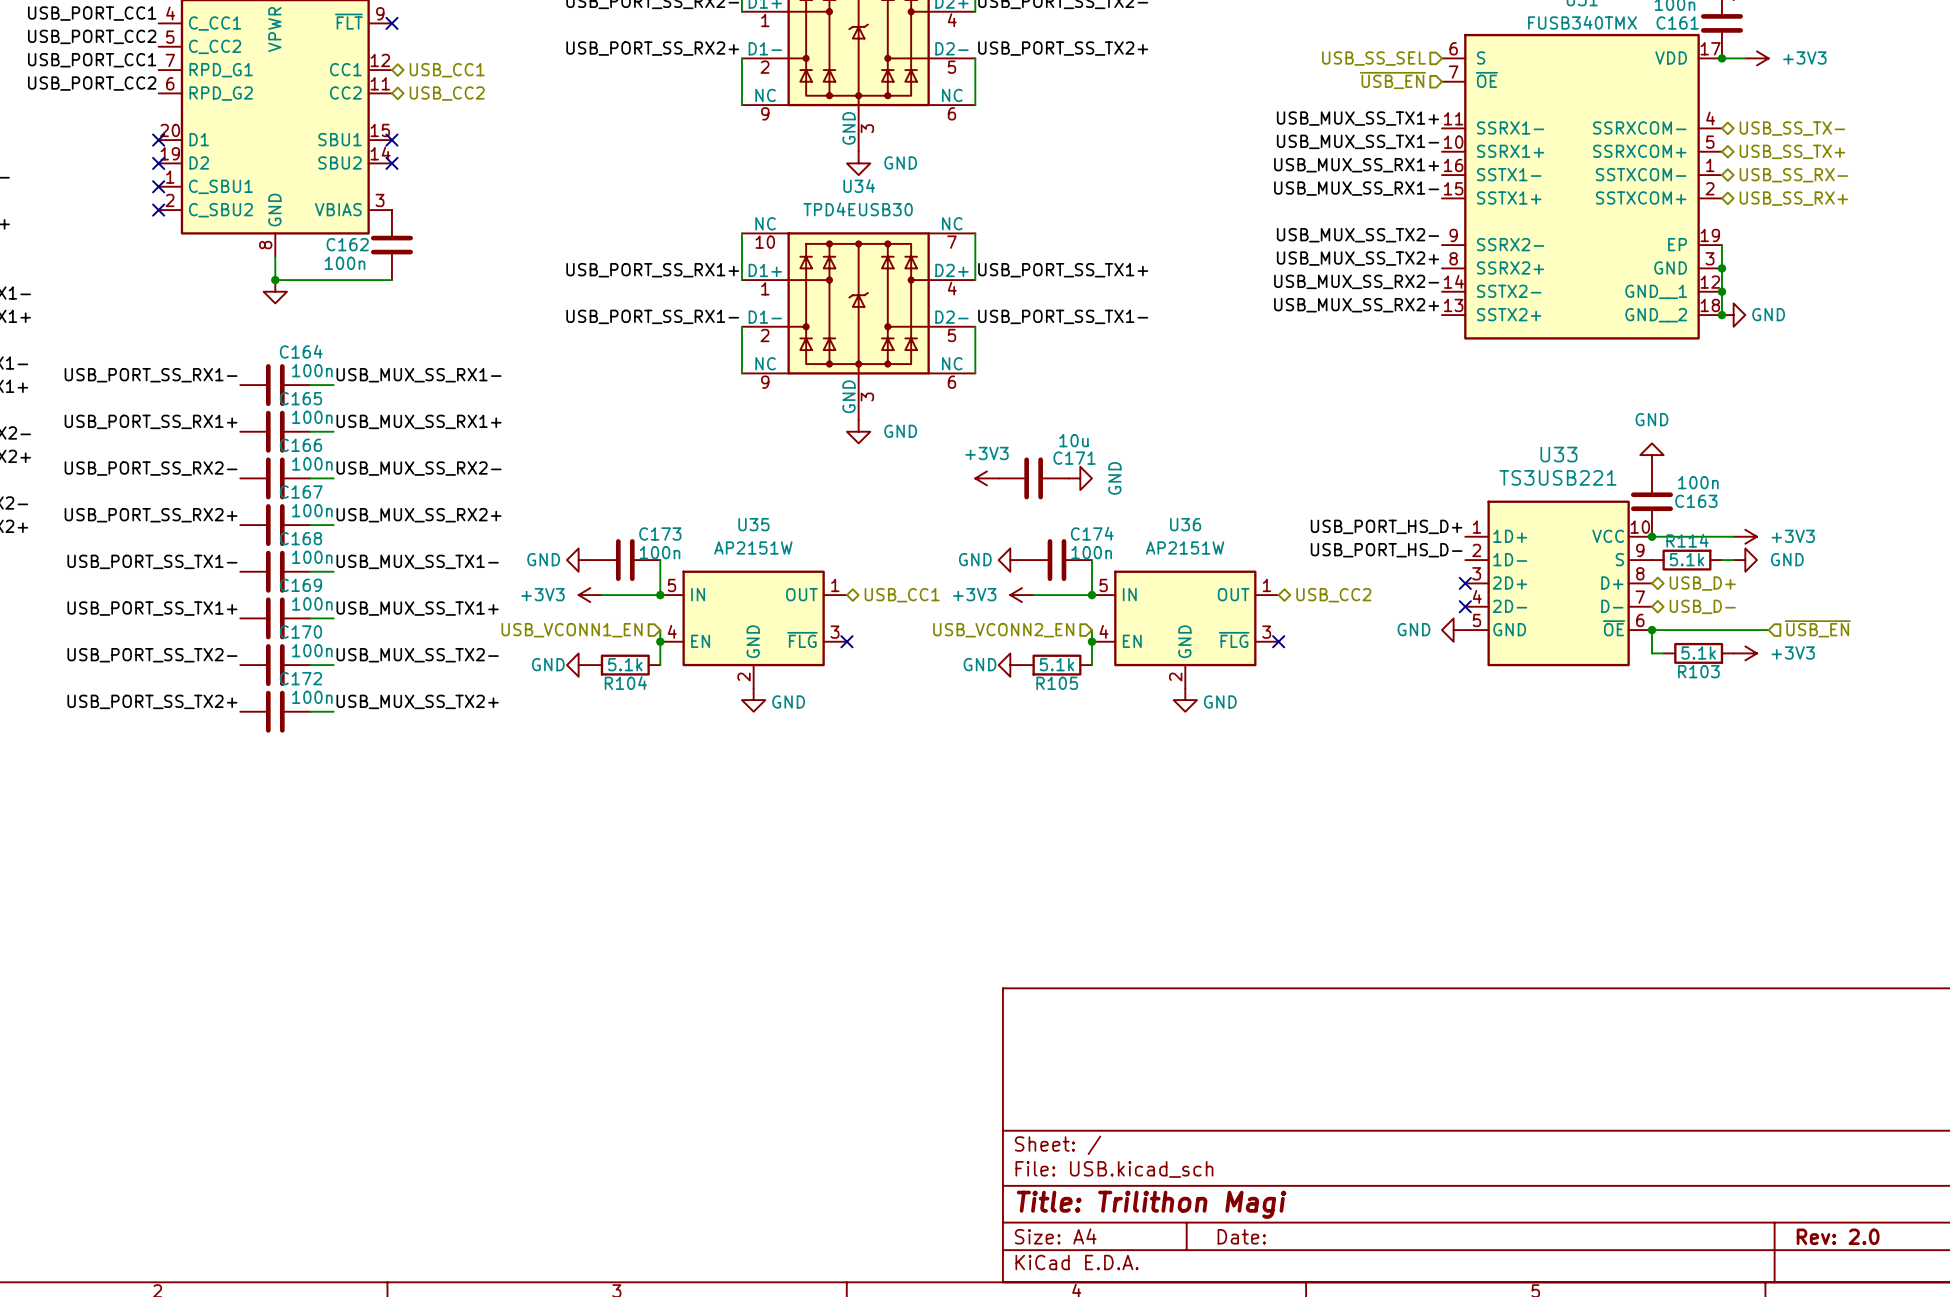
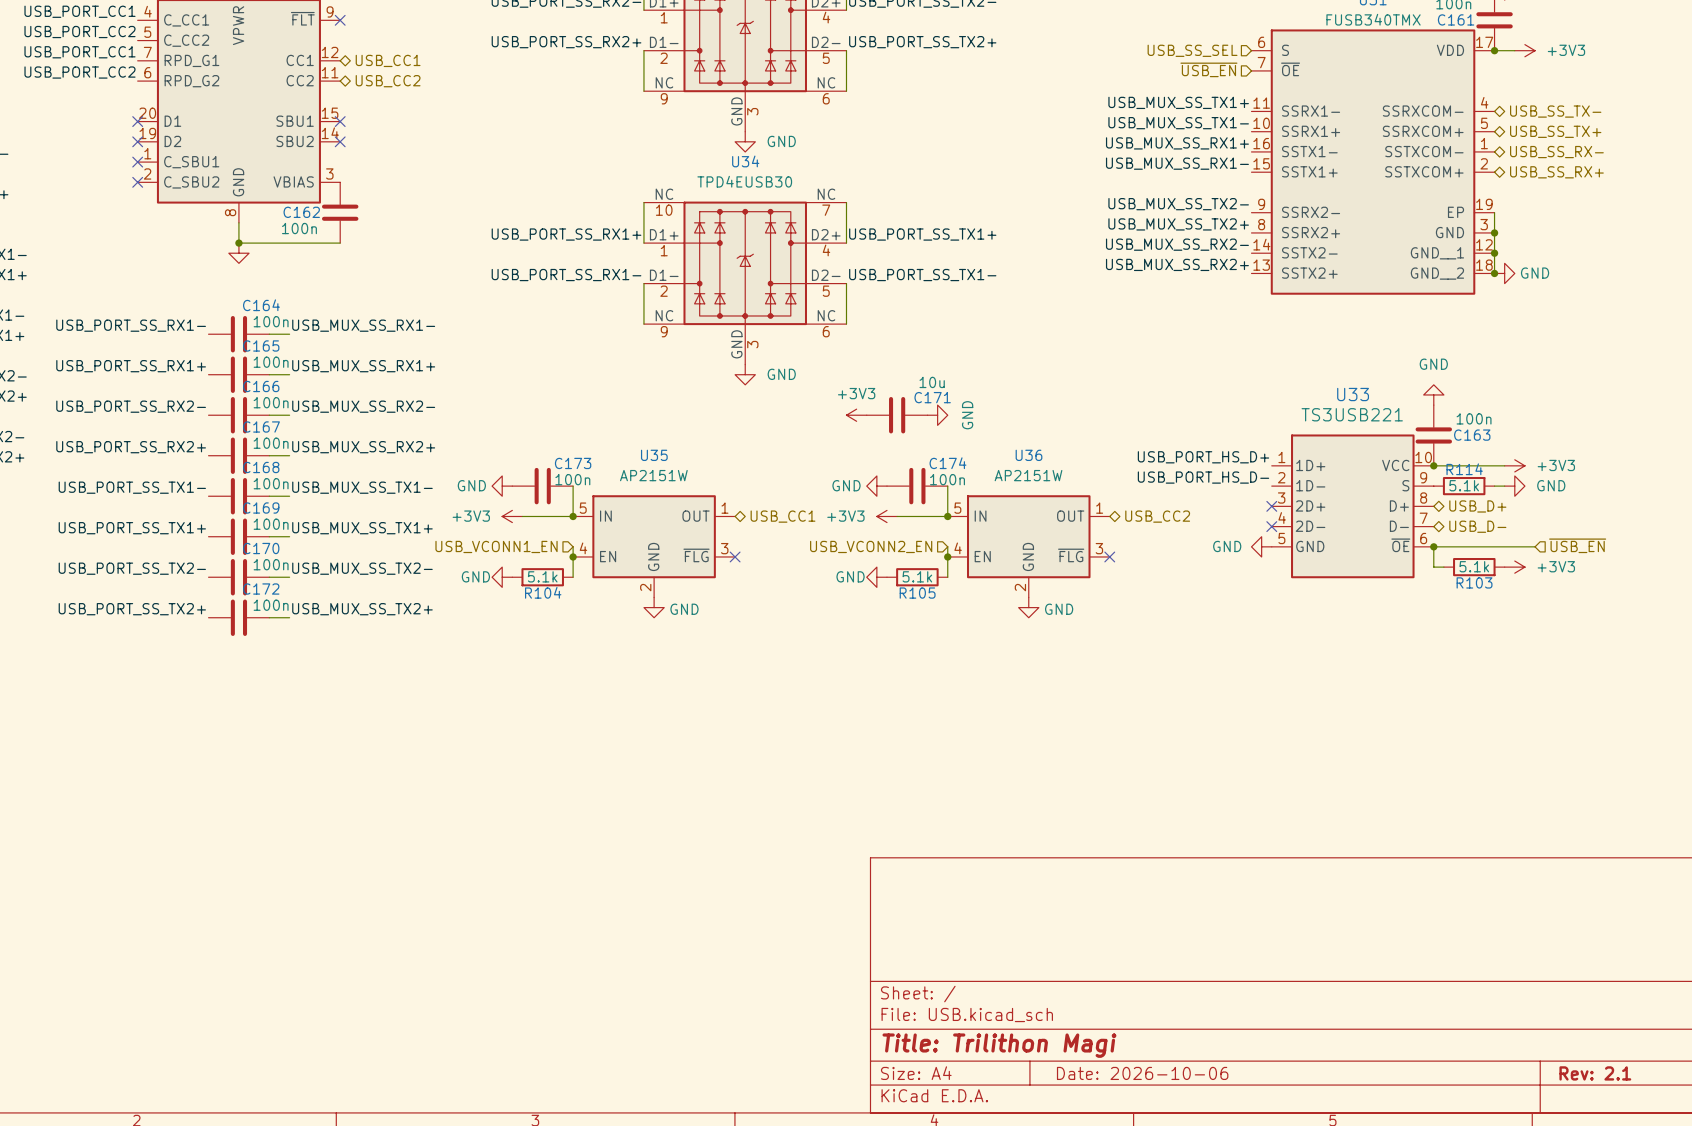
title block: Date: (1241, 1236) -> Date: 2026-10-06 (1142, 1073)
title block: Rev: 2.0 (1838, 1236) -> Rev: 2.1 (1595, 1073)

